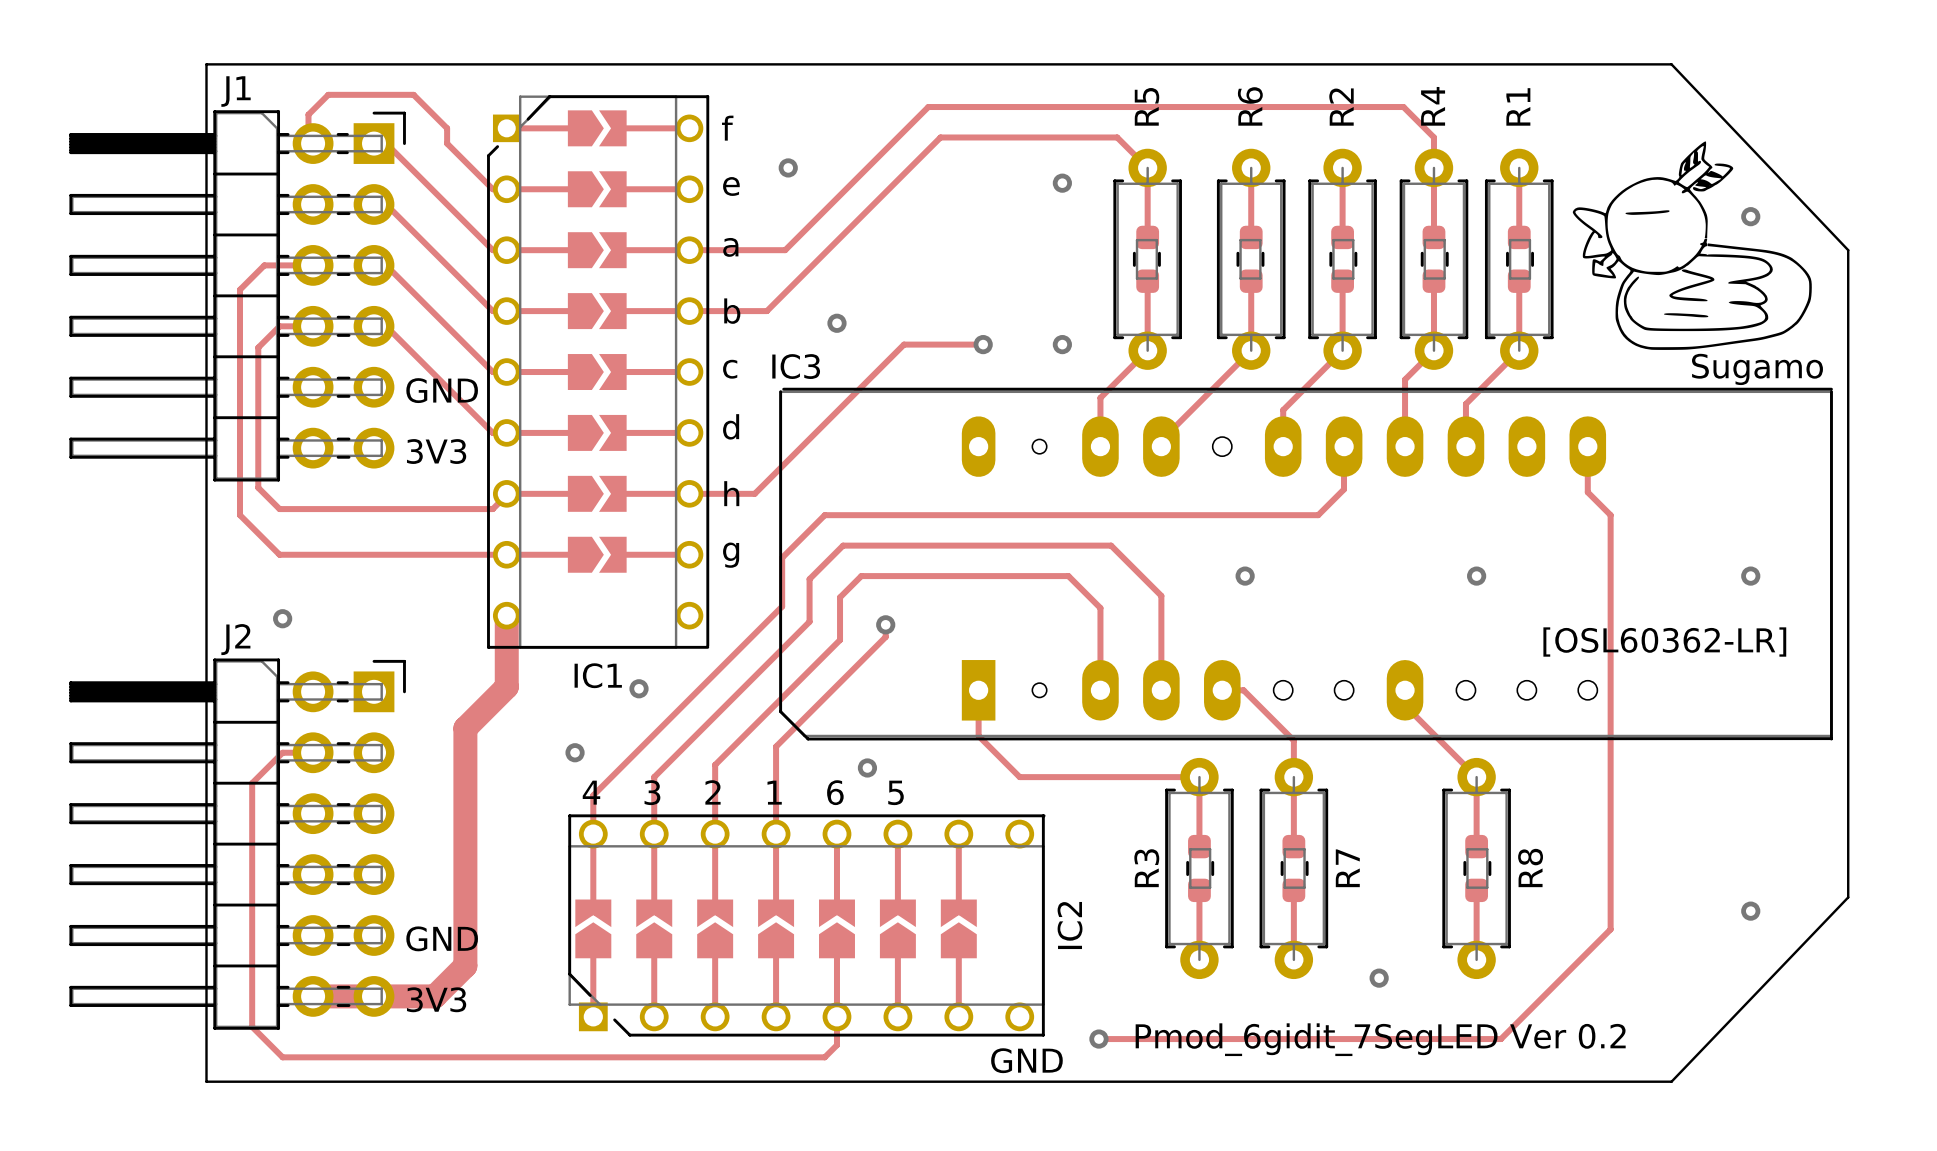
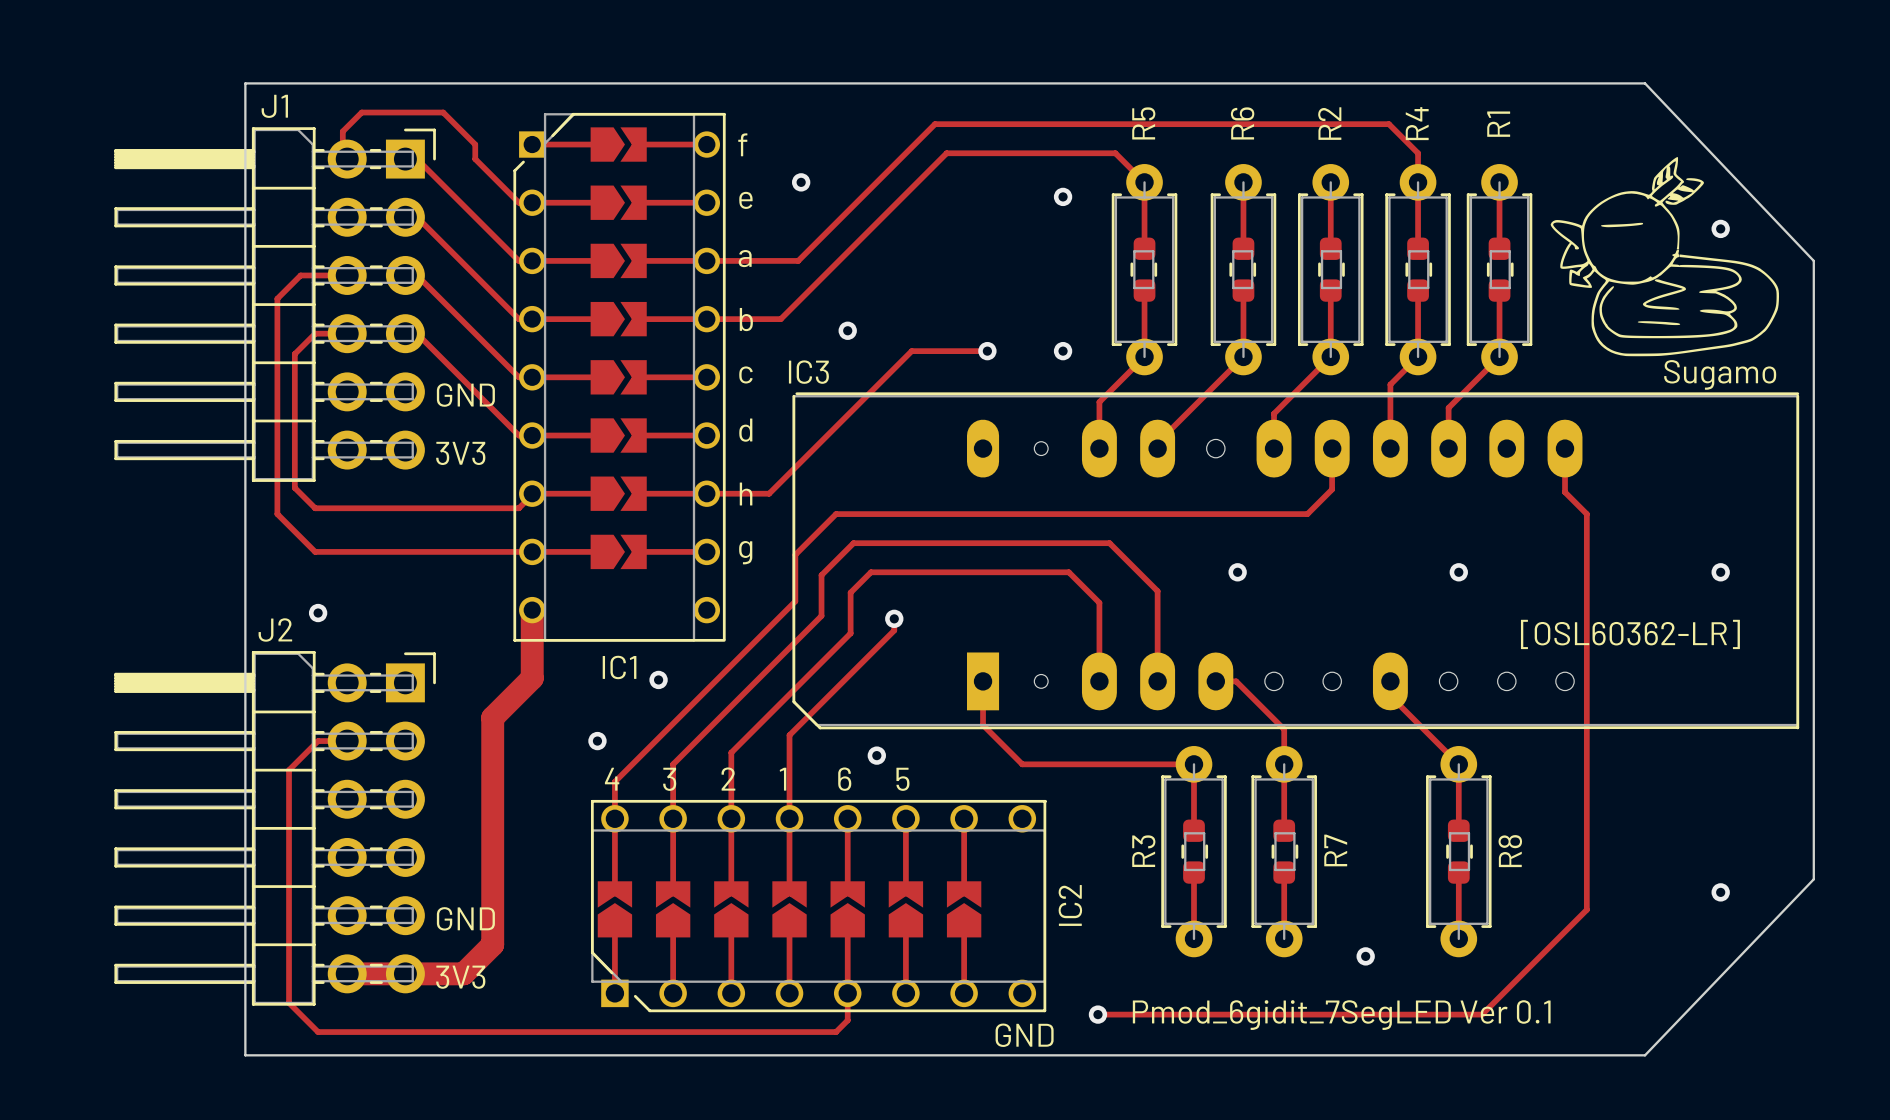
text: Pmod_6gidit_7SegLED Ver 0.2 (1380, 1039) -> Pmod_6gidit_7SegLED Ver 0.1 (1341, 1015)

